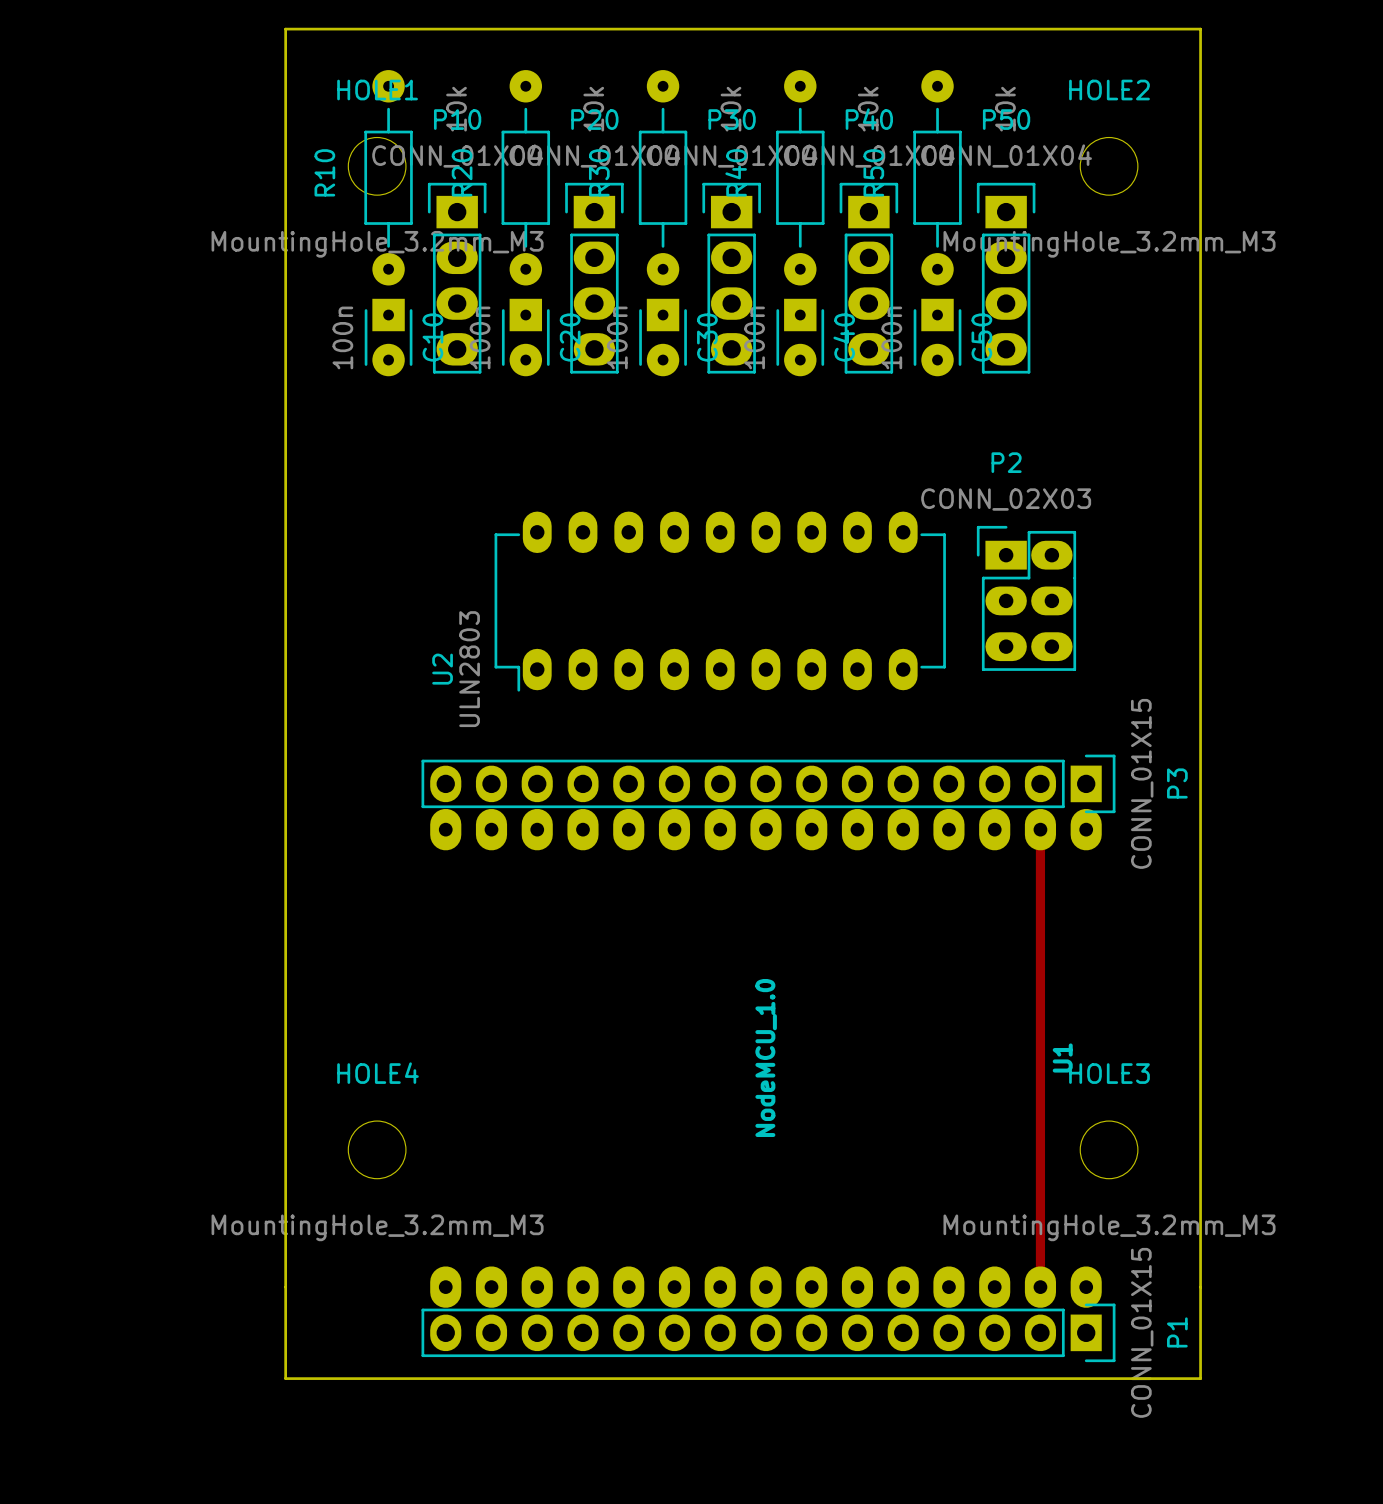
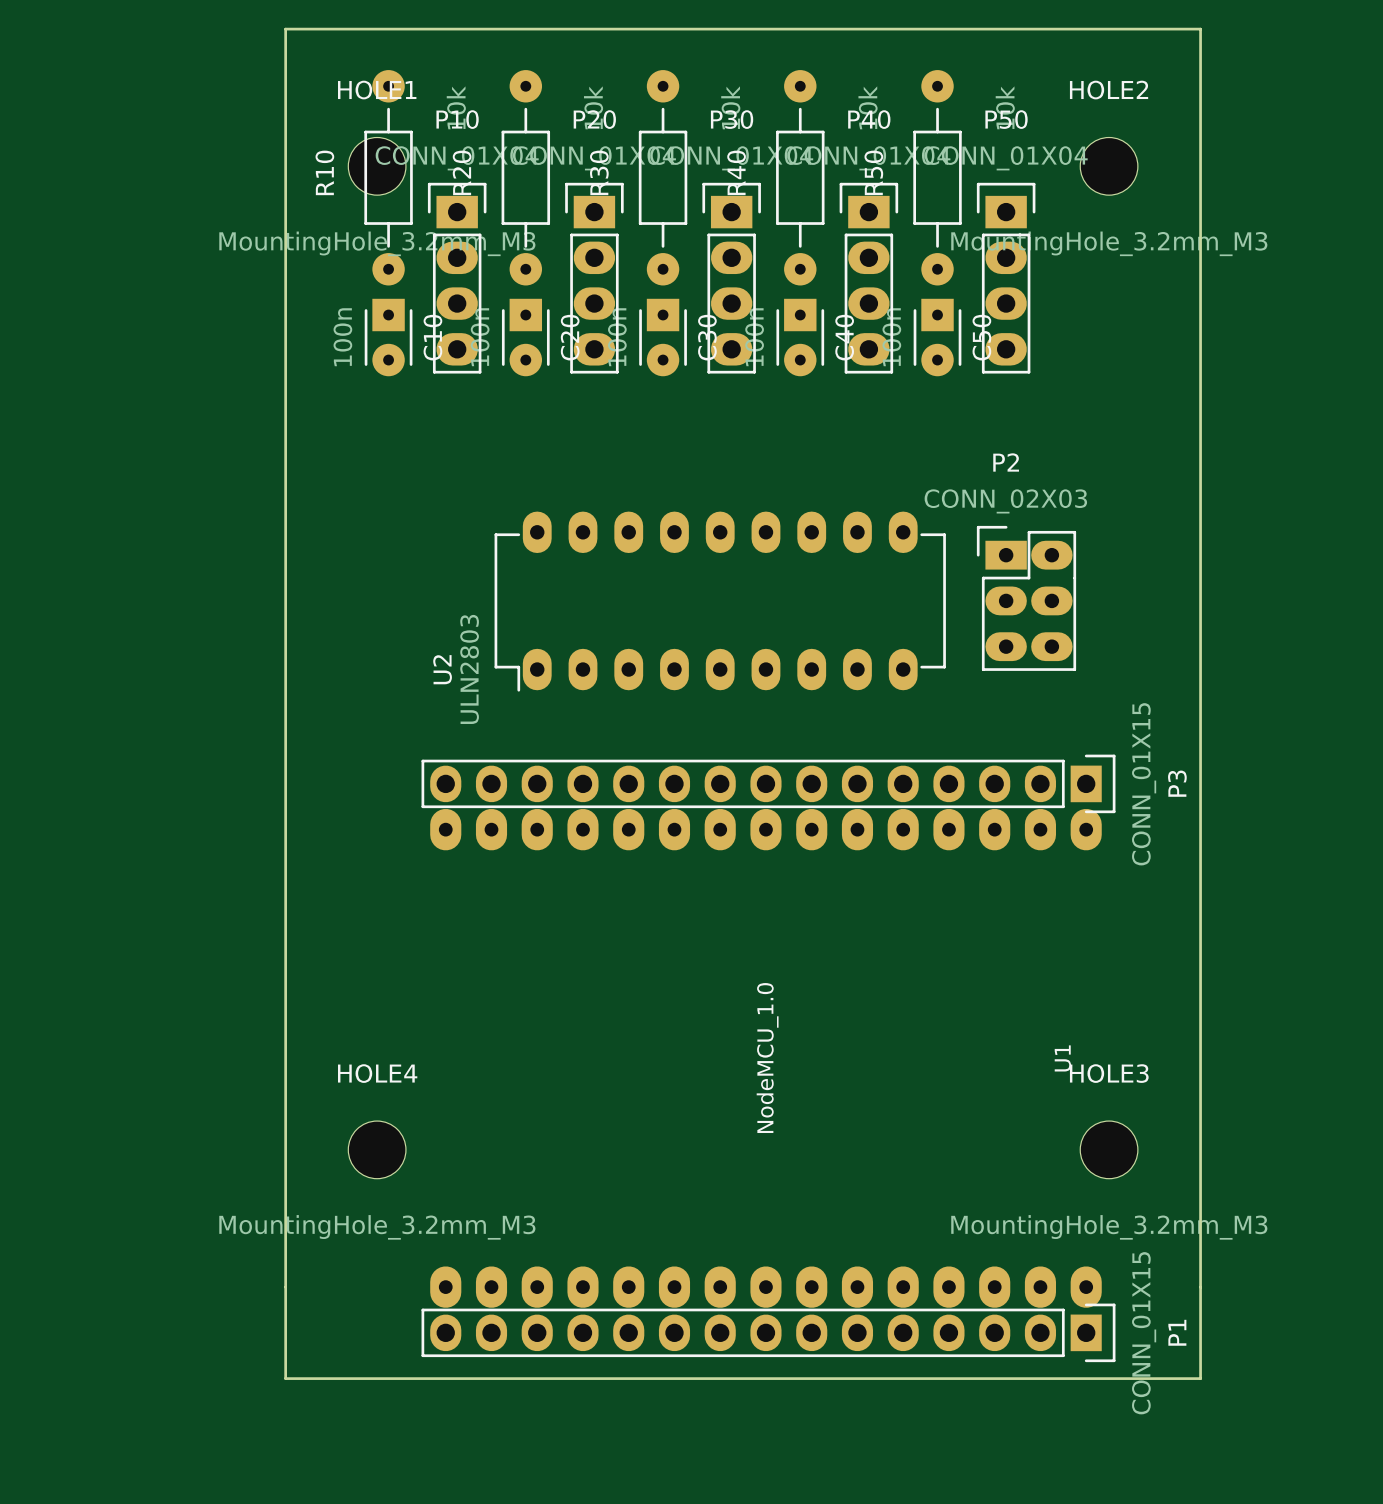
track: (1040, 829) (1040, 1287) -> none

